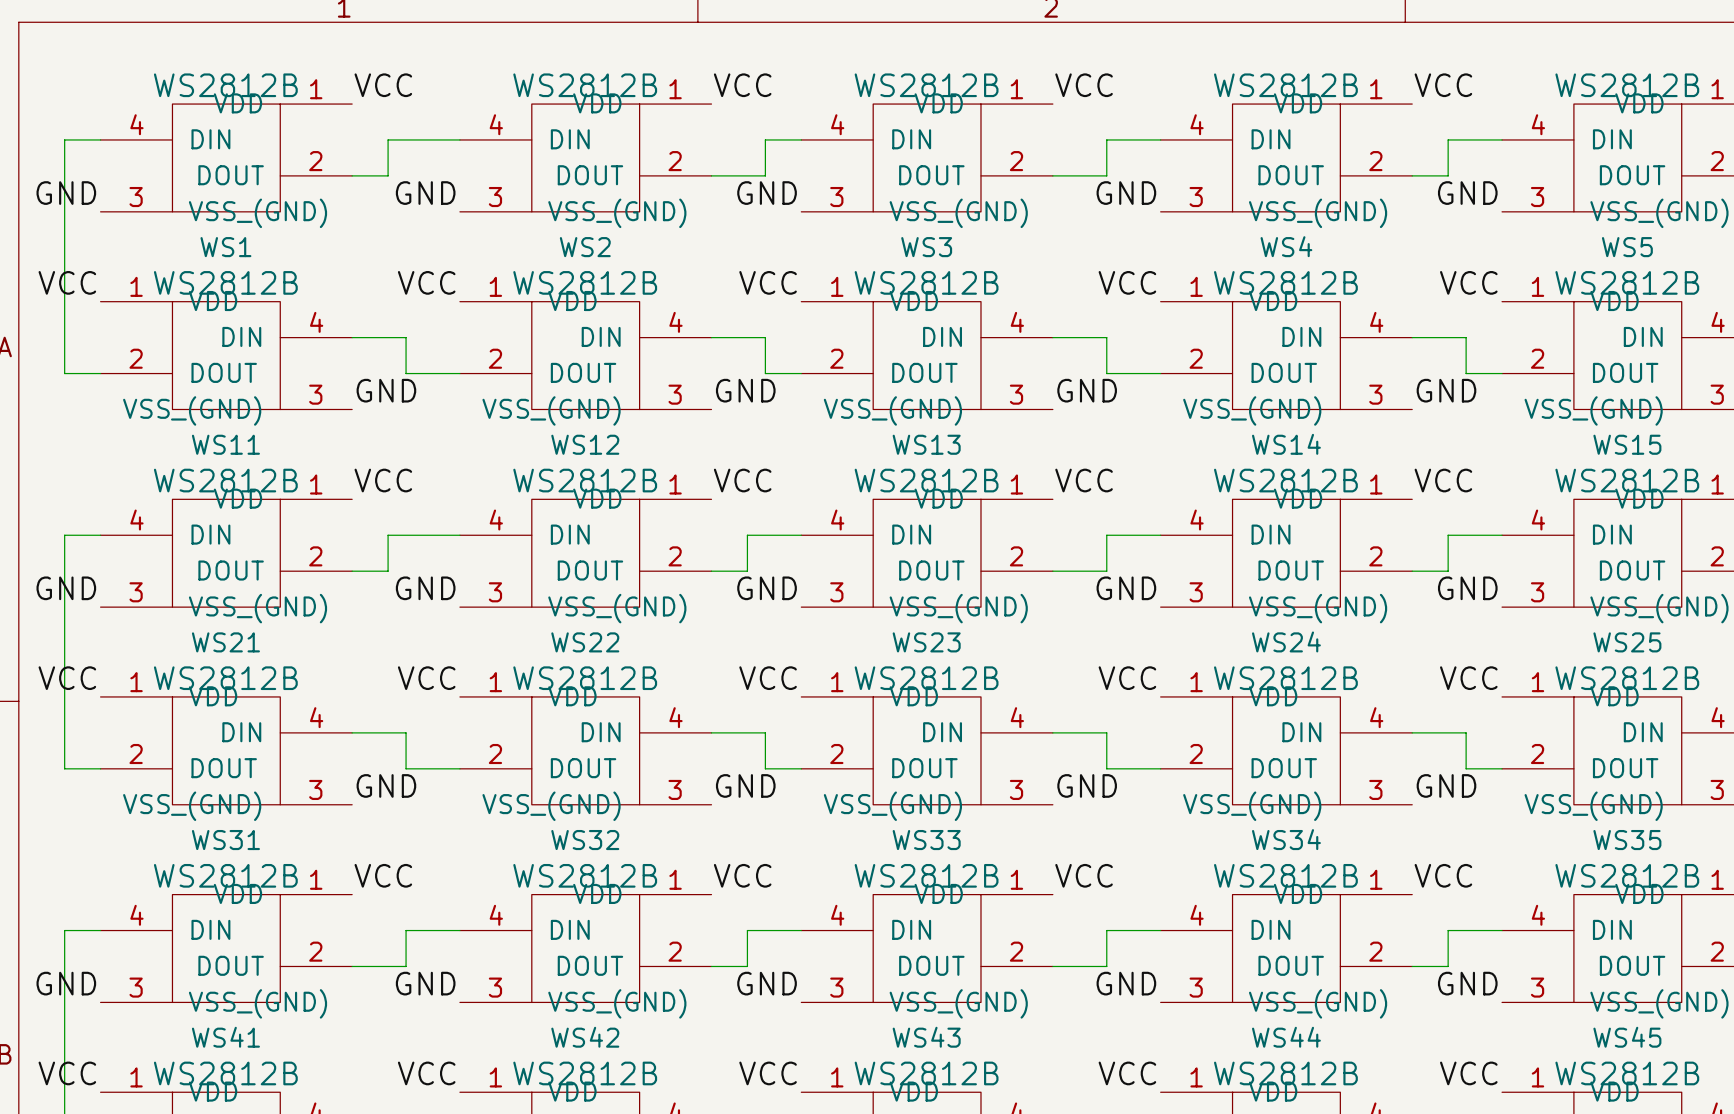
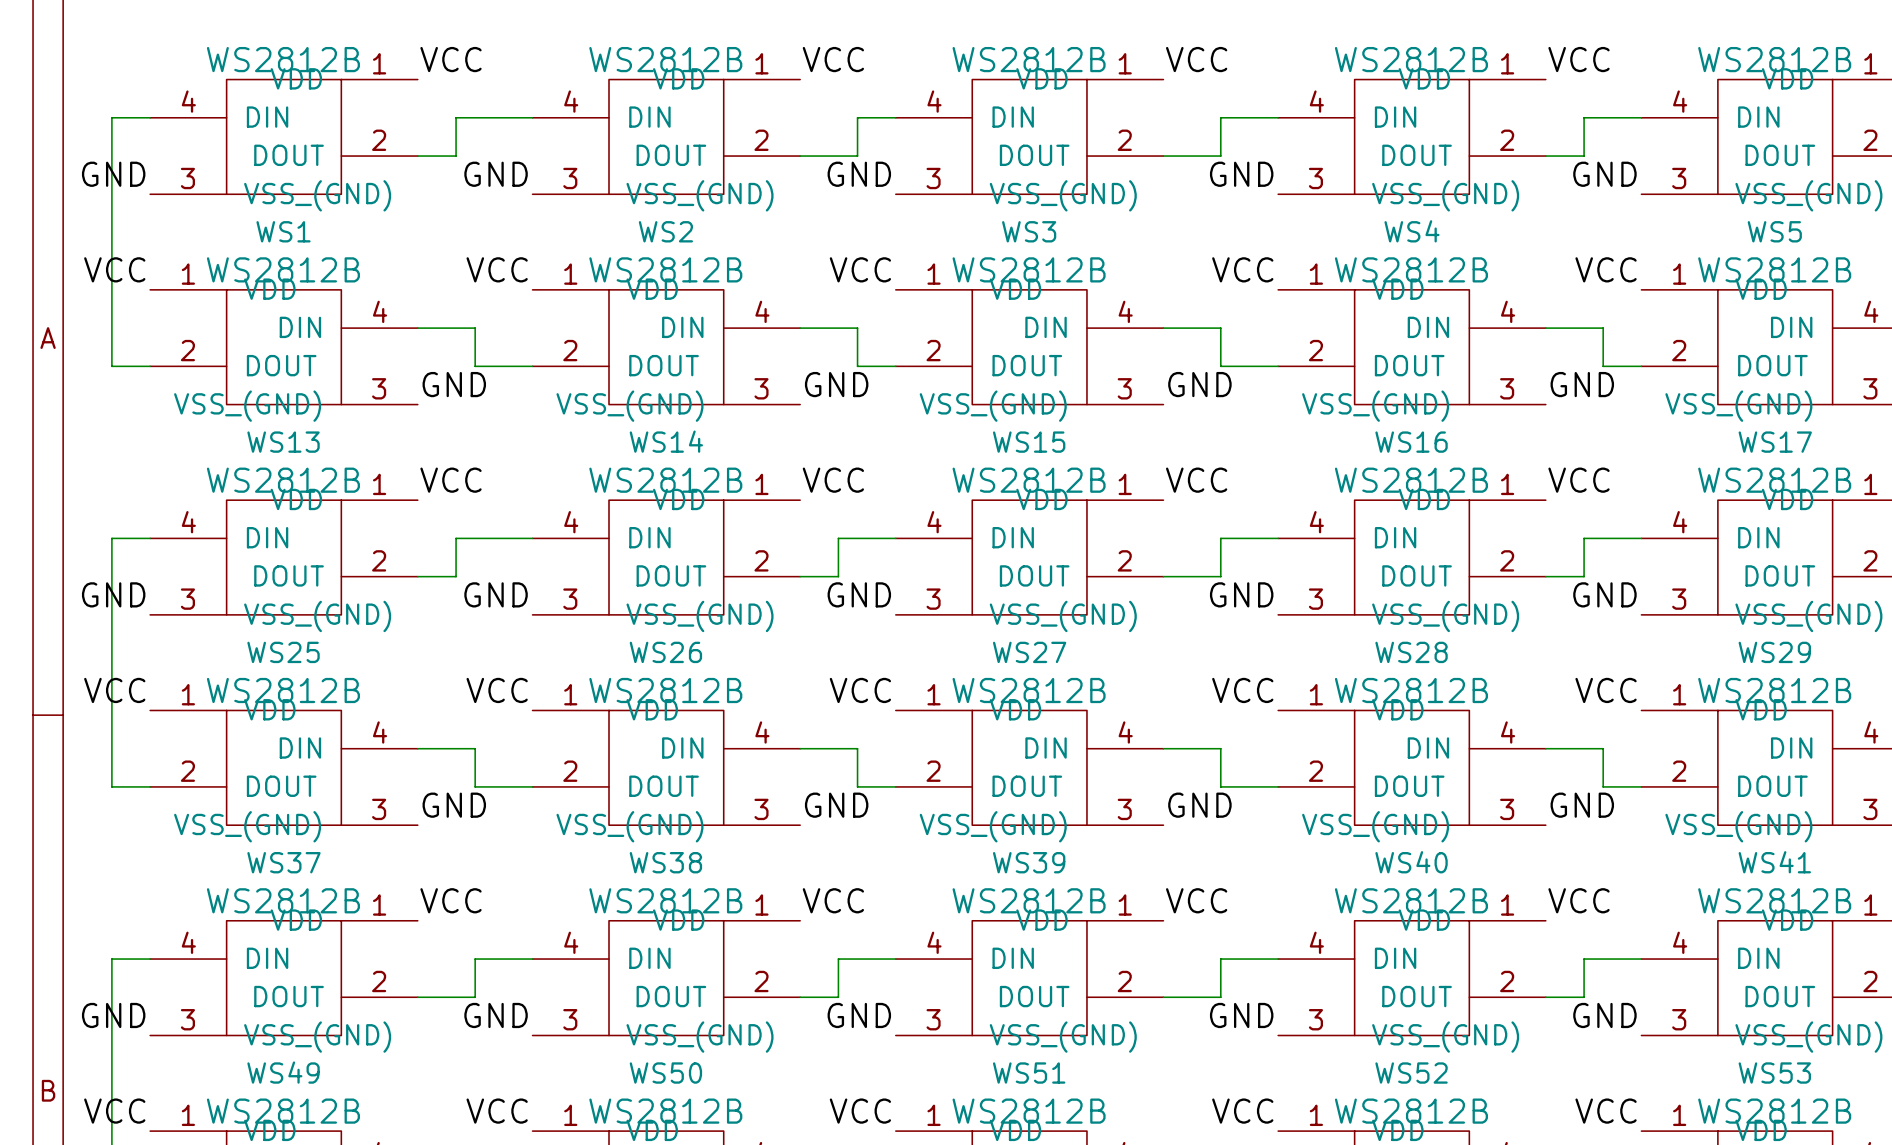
WS11 name: WS11 (225, 444) -> WS13 (283, 442)
WS12 name: WS12 (585, 444) -> WS14 (666, 441)
WS13 name: WS13 (926, 444) -> WS15 (1029, 442)
WS14 name: WS14 (1286, 444) -> WS16 (1411, 442)
WS15 name: WS15 (1627, 444) -> WS17 (1775, 442)
WS24 name: WS24 (1286, 641) -> WS28 (1411, 652)
WS21 name: WS21 (225, 642) -> WS25 (283, 652)
WS22 name: WS22 (585, 642) -> WS26 (665, 652)
WS23 name: WS23 (926, 642) -> WS27 (1029, 652)
WS25 name: WS25 (1627, 642) -> WS29 (1774, 652)
WS34 name: WS34 (1286, 839) -> WS40 (1411, 862)
WS31 name: WS31 (225, 840) -> WS37 (283, 862)
WS32 name: WS32 (585, 840) -> WS38 (665, 862)
WS33 name: WS33 (926, 840) -> WS39 (1029, 862)
WS35 name: WS35 (1627, 840) -> WS41 (1774, 862)
WS41 name: WS41 (225, 1037) -> WS49 (283, 1072)
WS42 name: WS42 (585, 1037) -> WS50 (665, 1073)
WS43 name: WS43 (926, 1037) -> WS51 (1029, 1073)
WS44 name: WS44 (1286, 1037) -> WS52 (1411, 1073)
WS45 name: WS45 (1627, 1037) -> WS53 (1774, 1073)

